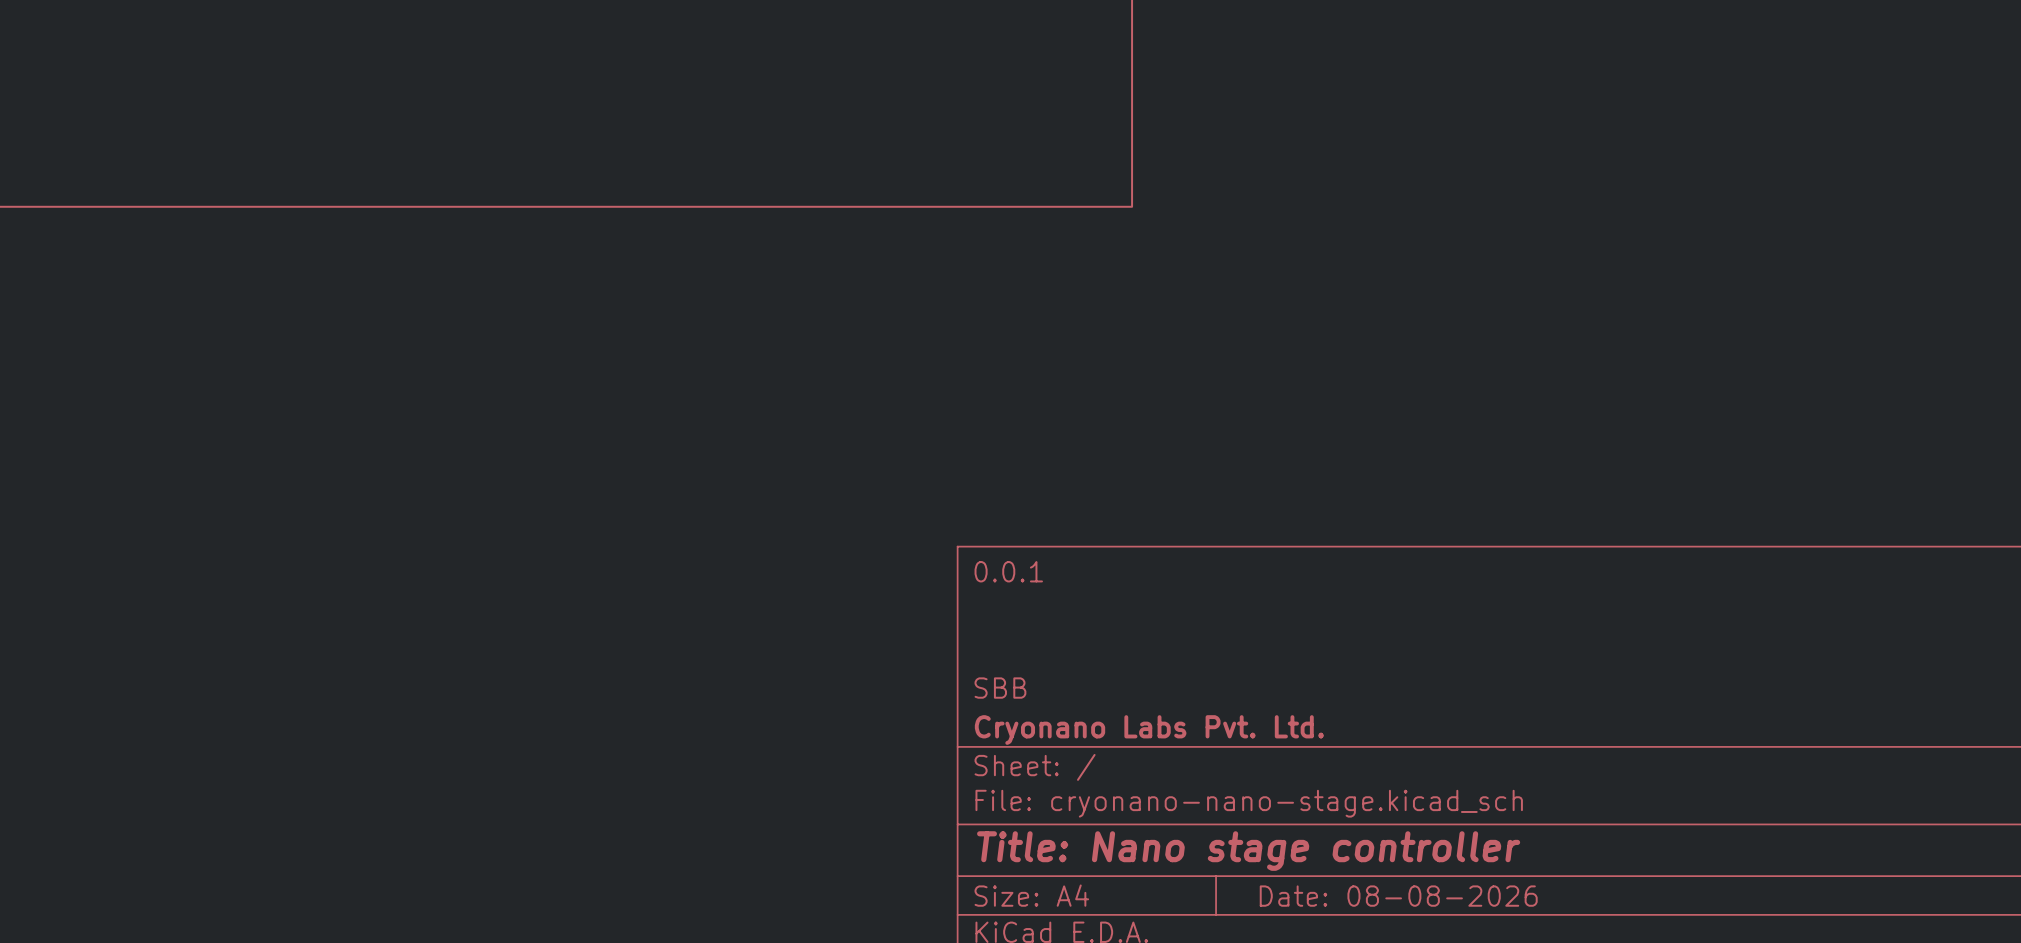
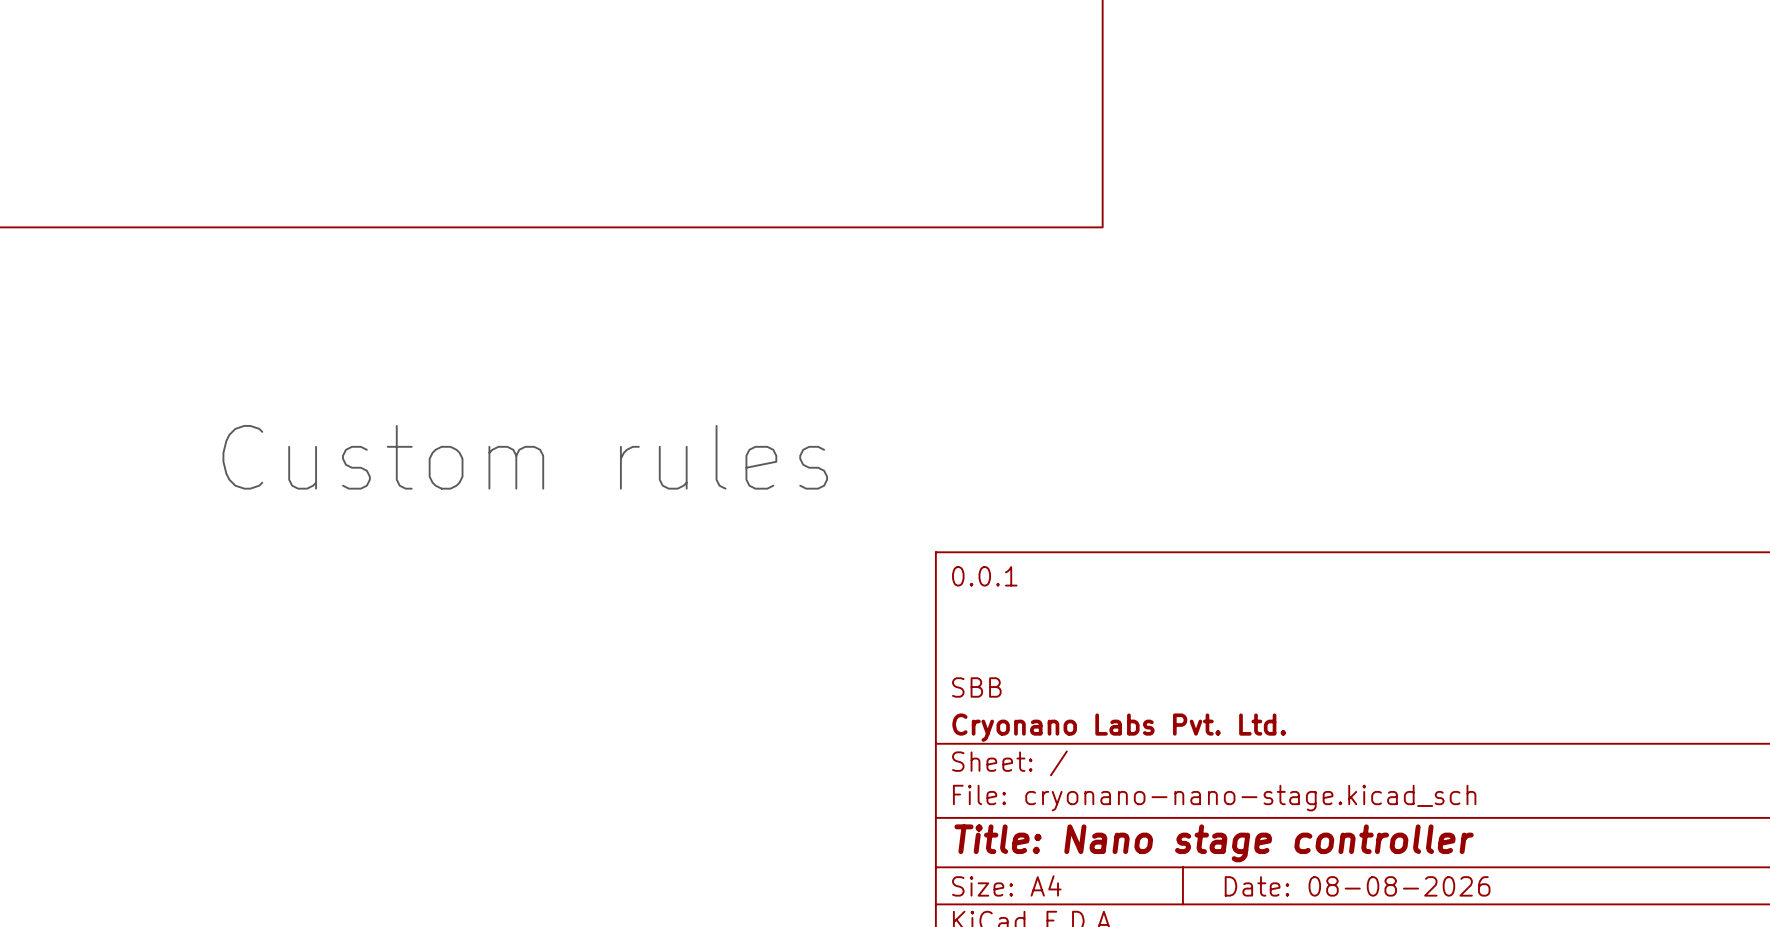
text: none -> Custom rules (525, 457)

